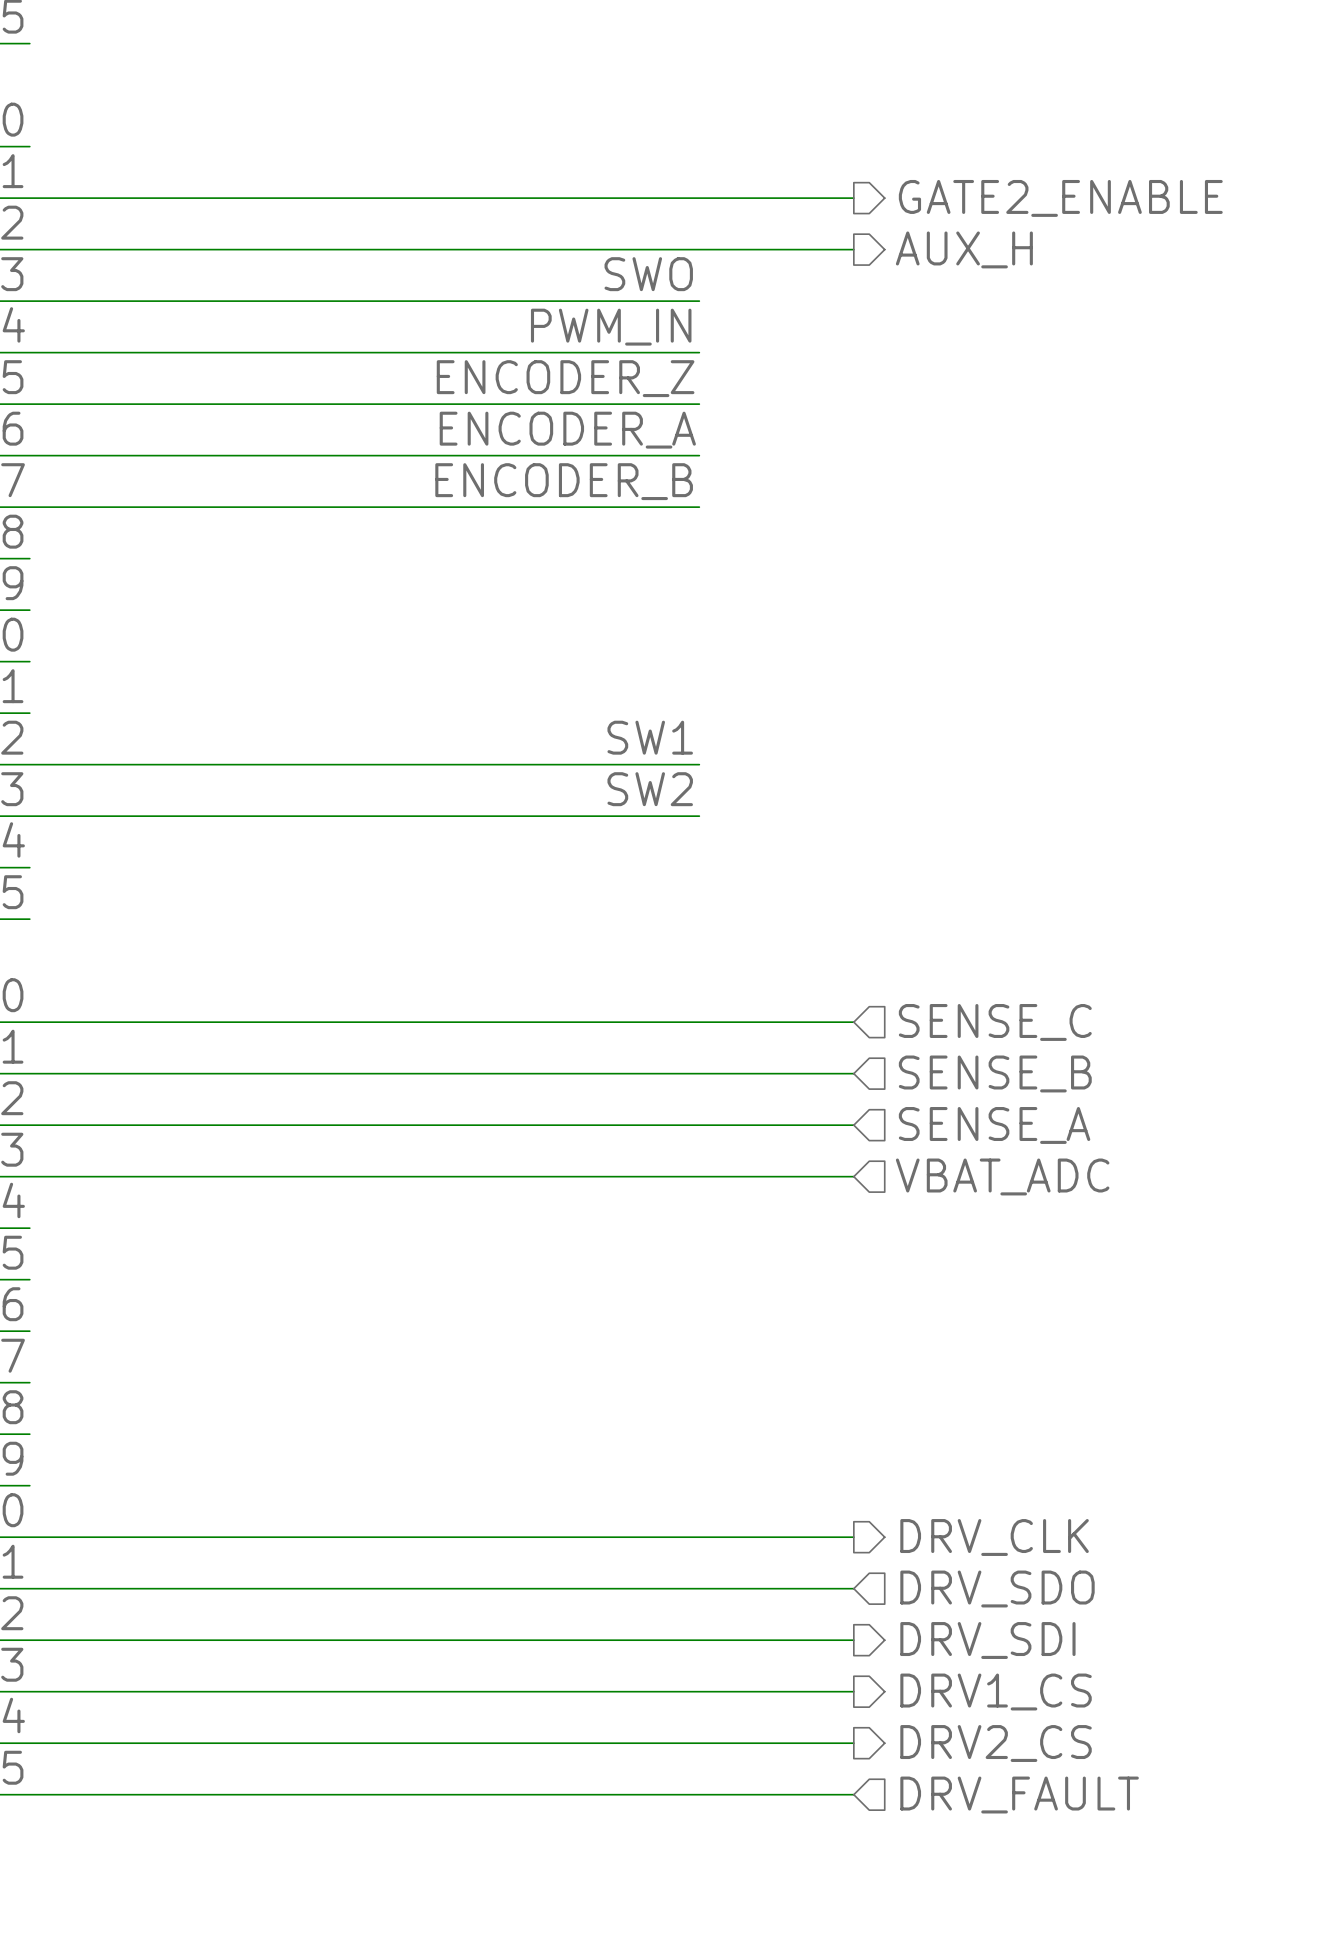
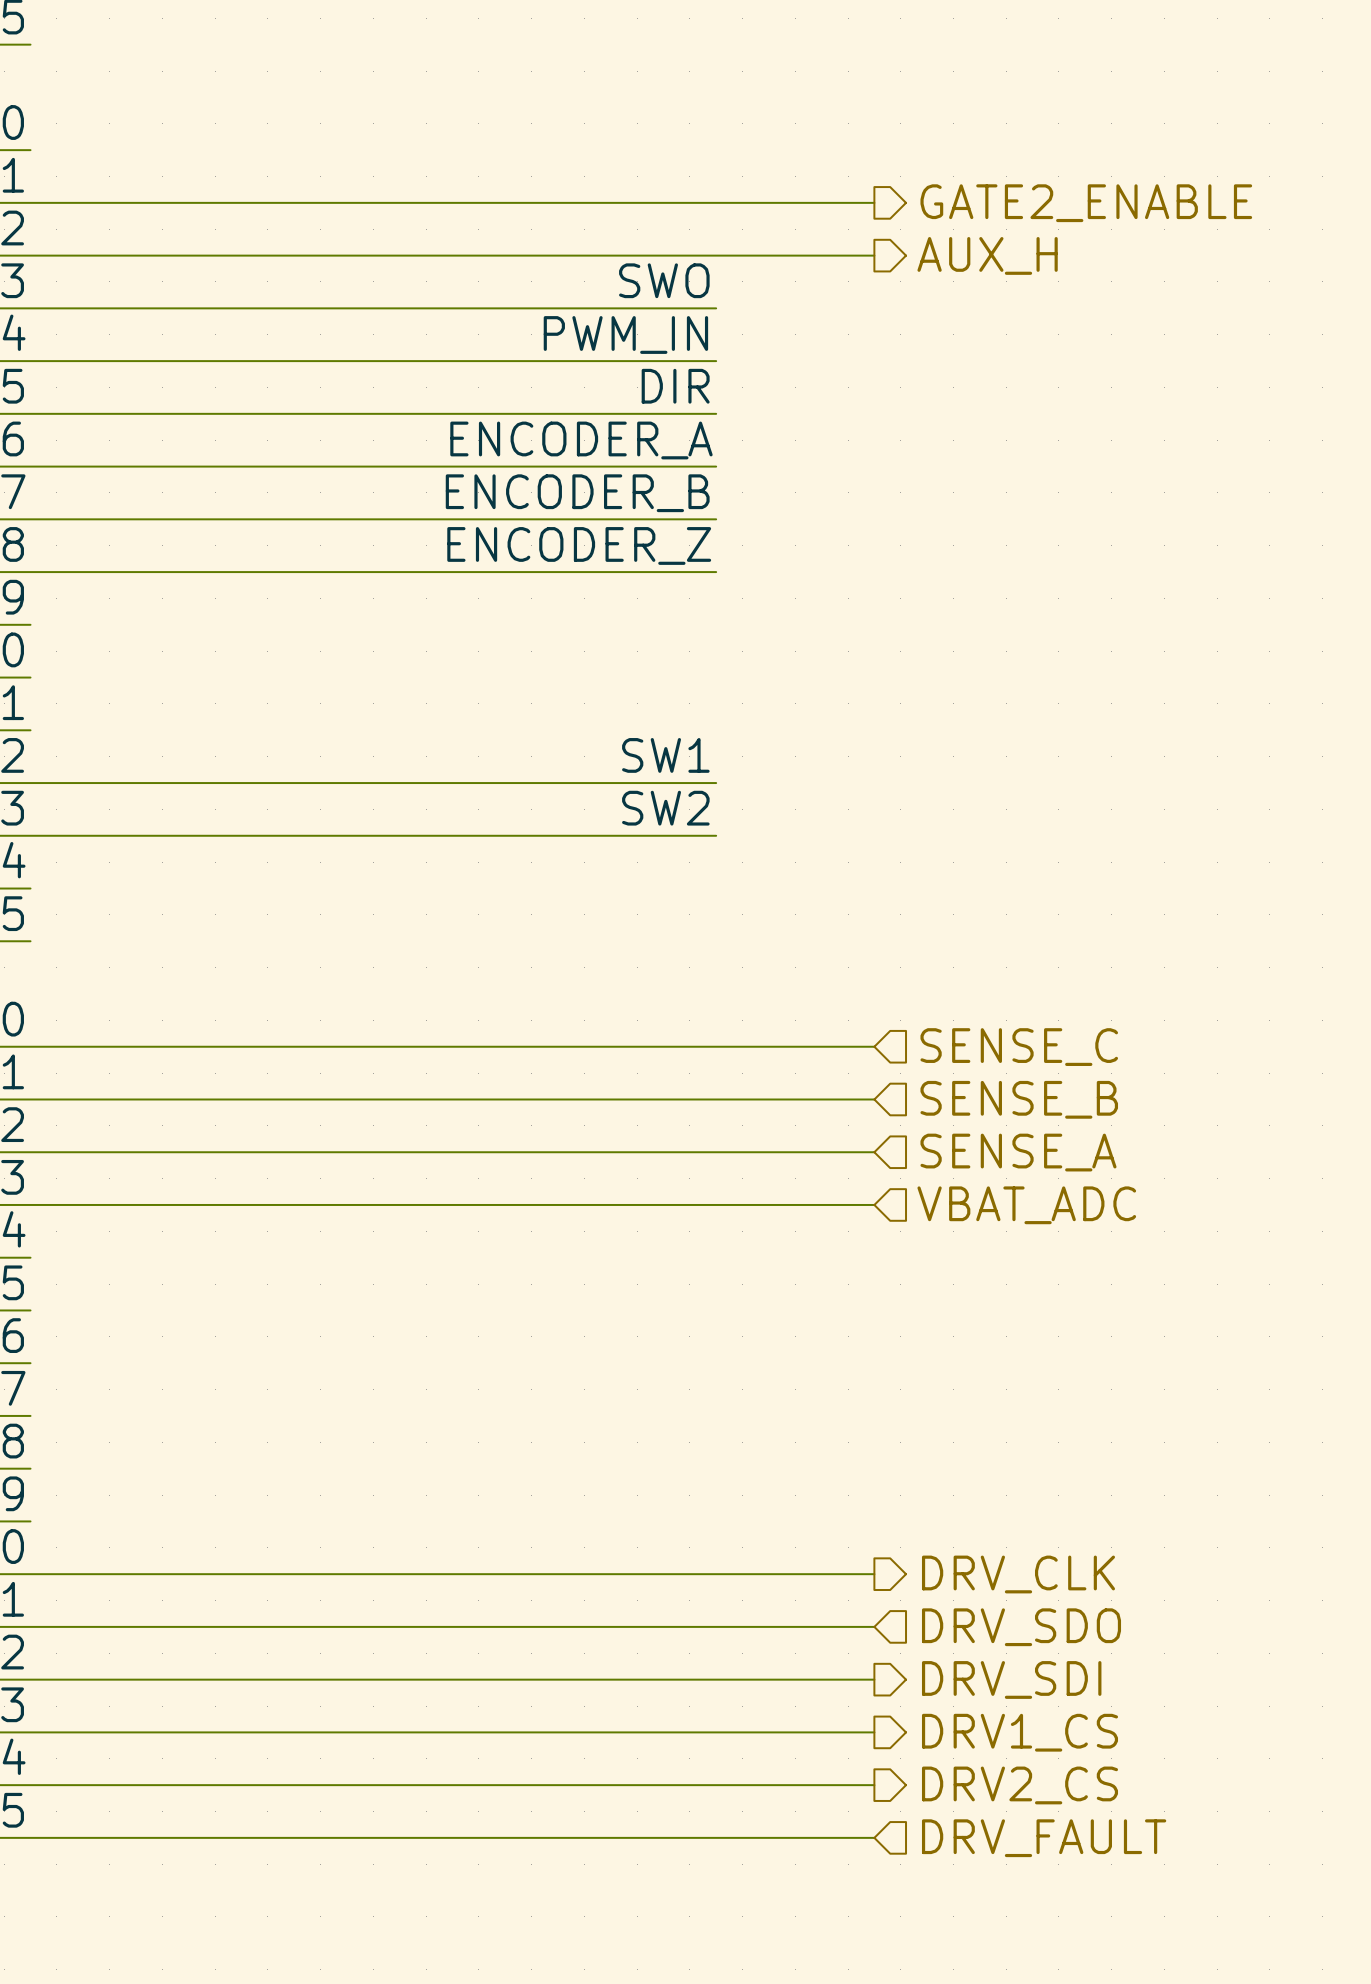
label: ENCODER_Z (565, 378) -> DIR (675, 386)
label: none -> ENCODER_Z (579, 545)
wire: none -> (30, 572) (716, 572)

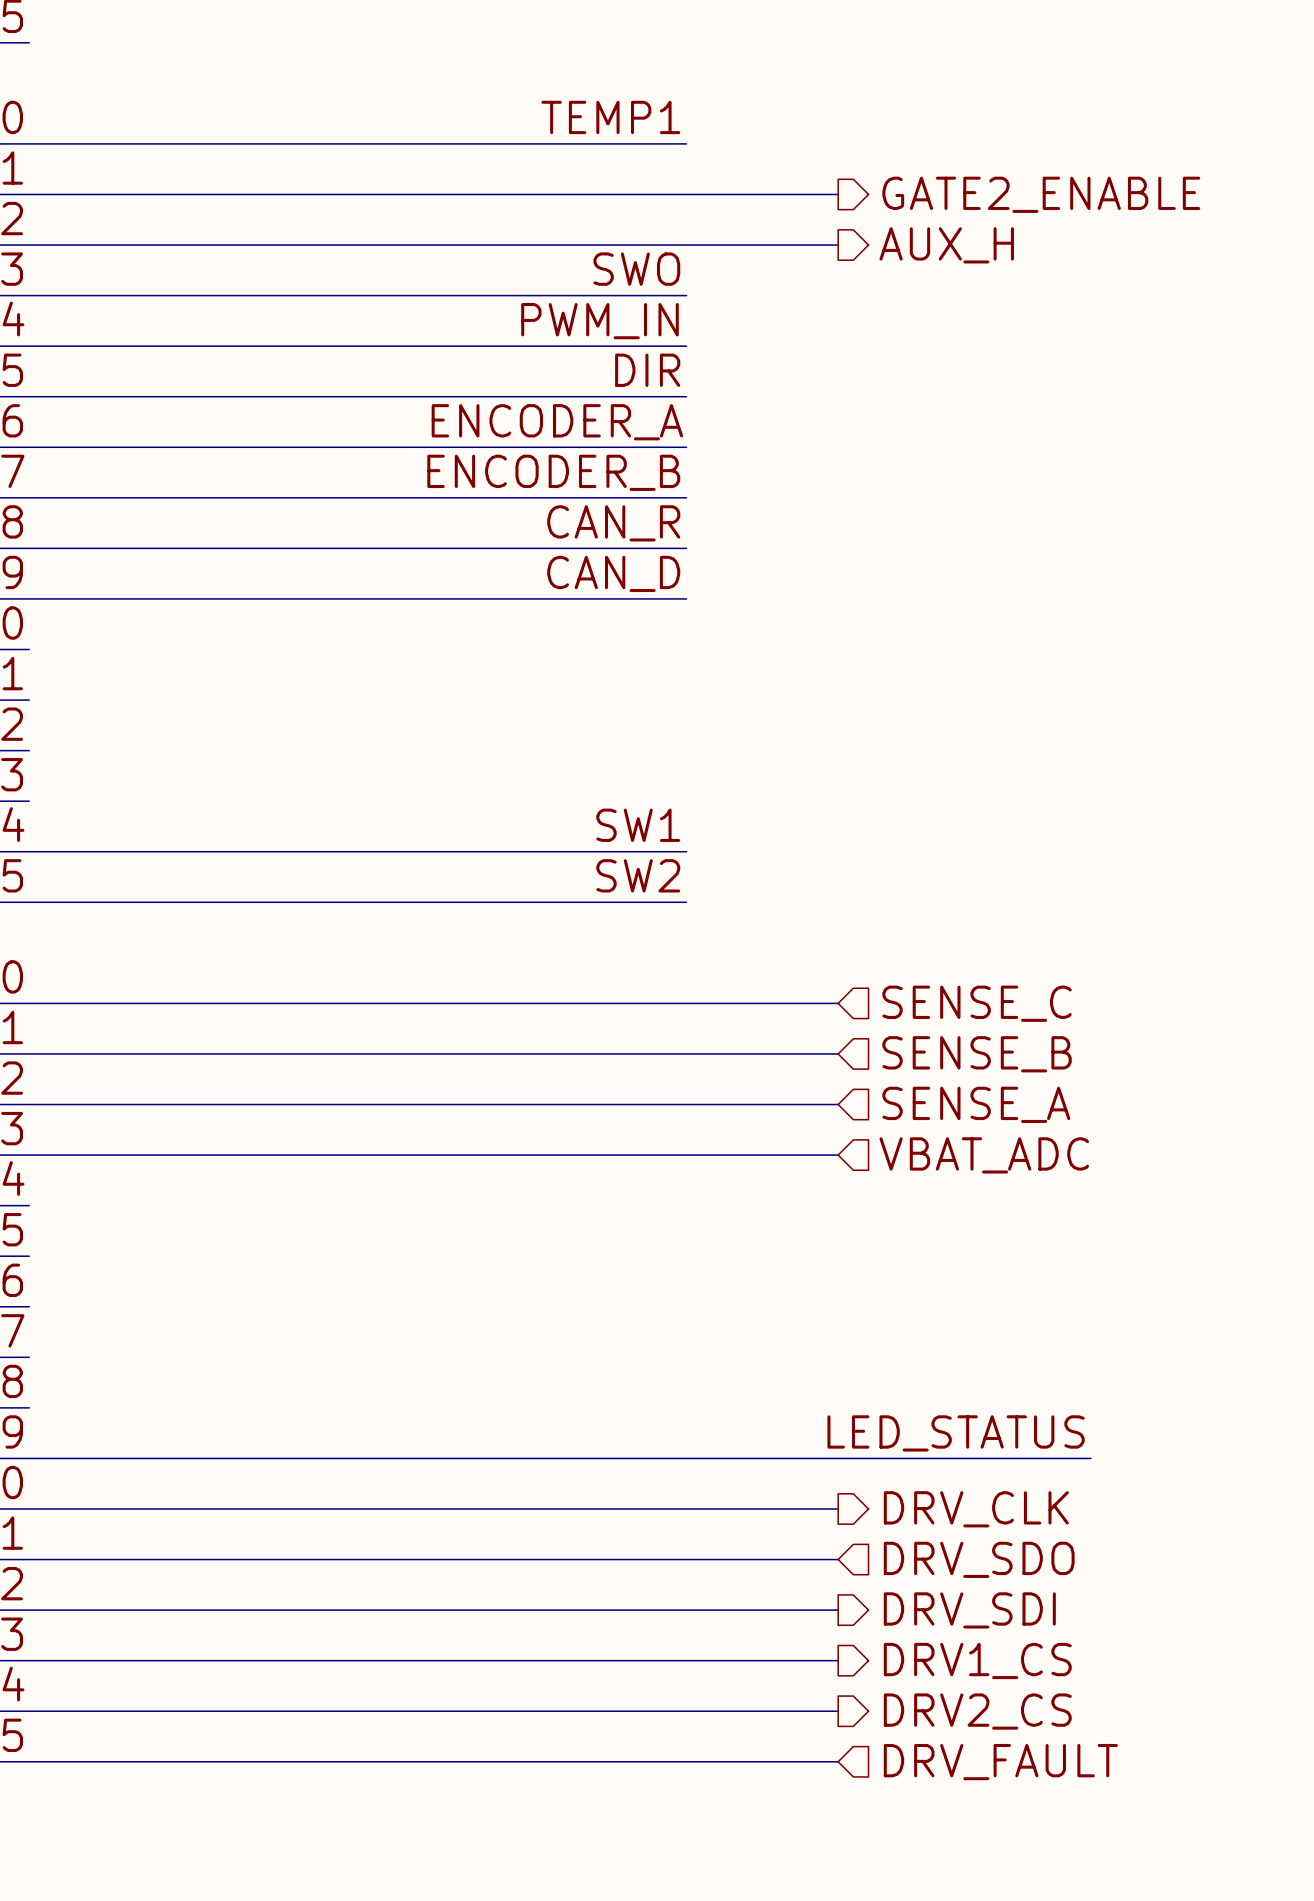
label: none -> TEMP1 (610, 117)
wire: none -> (29, 143) (686, 143)
label: ENCODER_Z (579, 545) -> CAN_R (613, 523)
label: none -> CAN_D (613, 573)
wire: none -> (29, 598) (686, 598)
label position: SW1 (665, 755) -> SW1 (638, 825)
wire: (30, 783) (716, 783) -> (29, 902) (686, 902)
label position: SW2 (665, 808) -> SW2 (638, 875)
wire: (30, 835) (716, 835) -> (29, 851) (686, 851)
label: none -> LED_STATUS (956, 1433)
wire: none -> (29, 1458) (1090, 1458)

